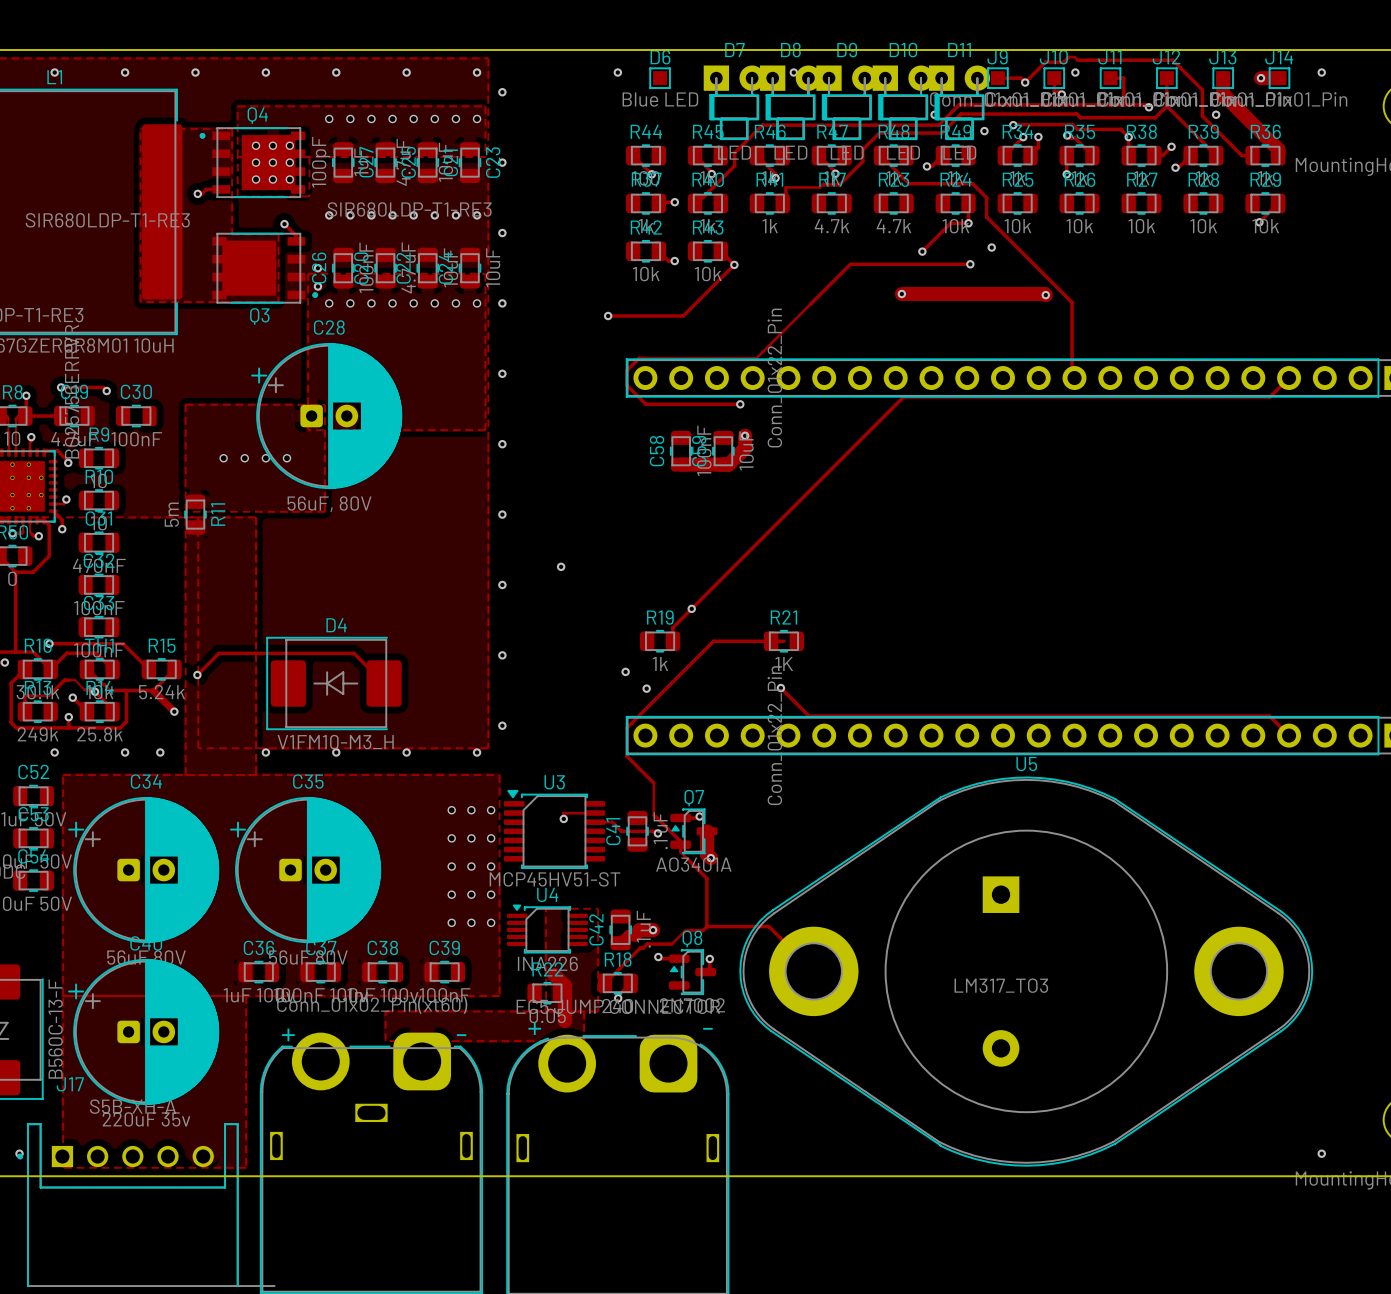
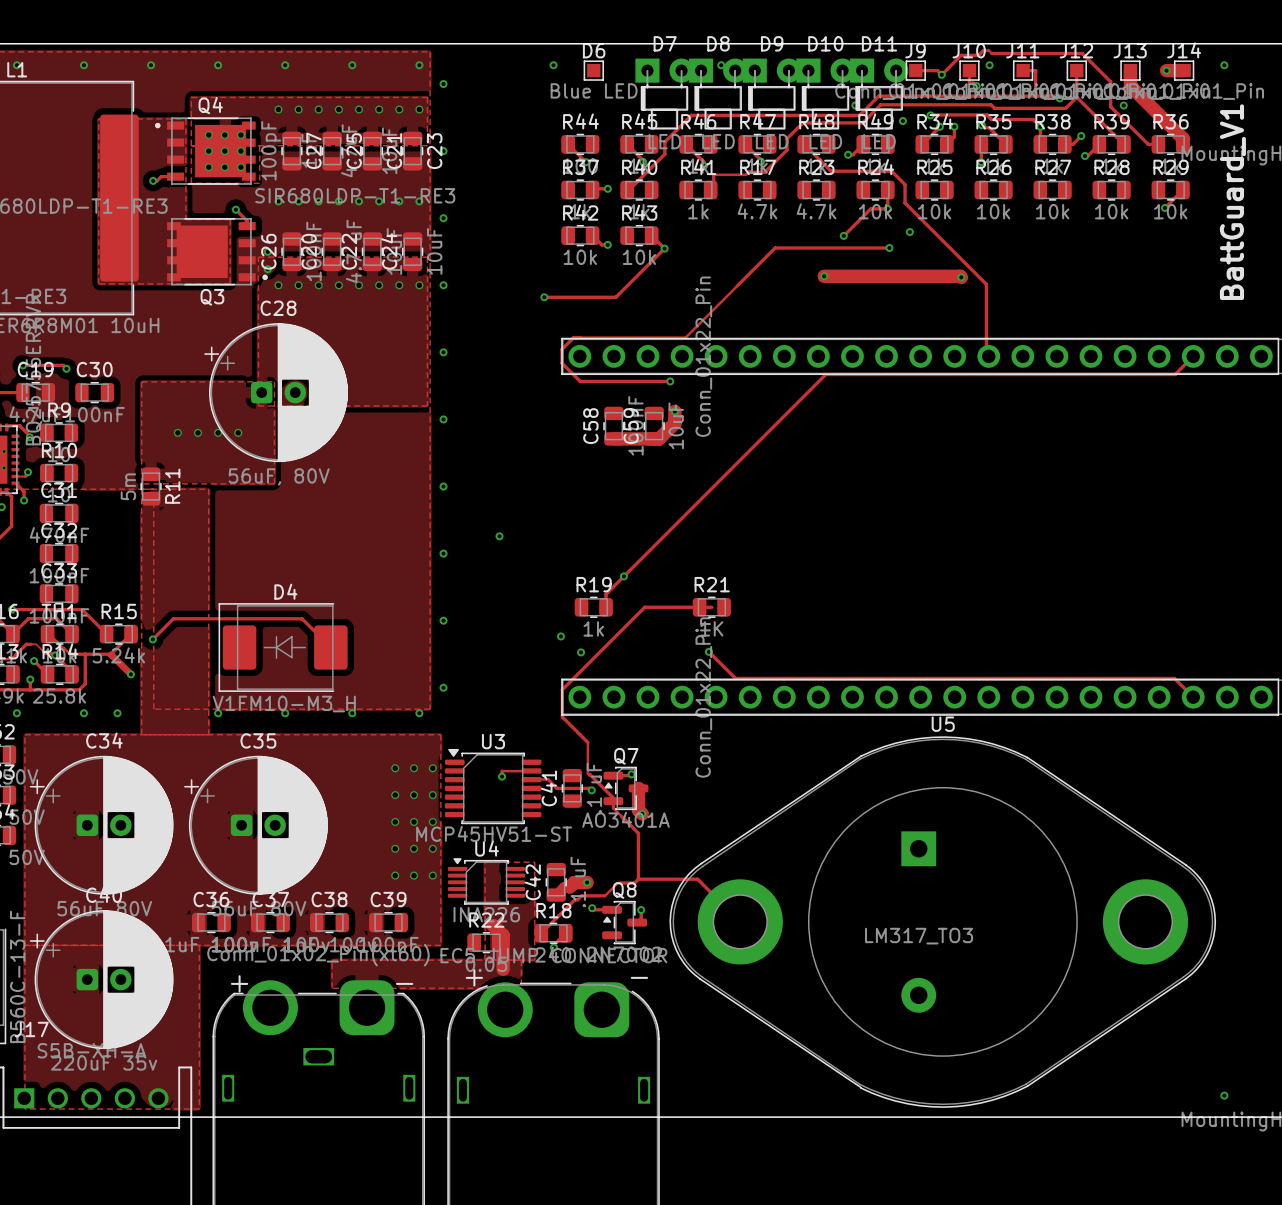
text: none -> BattGuard_V1 (1232, 202)

